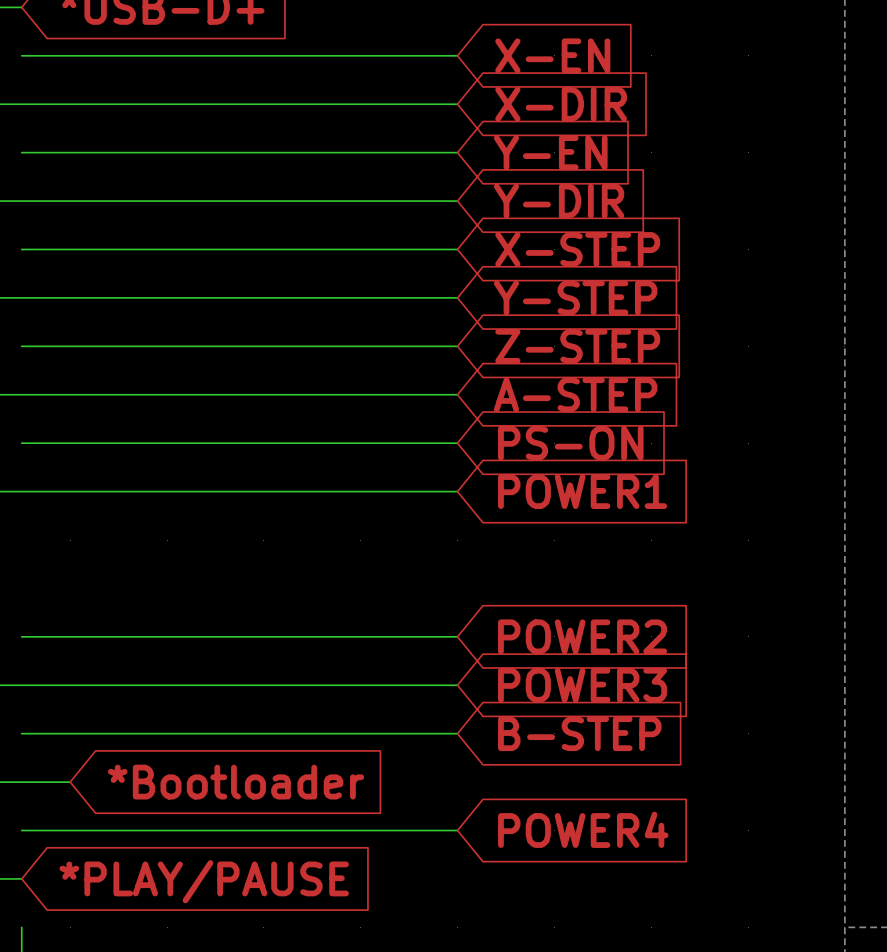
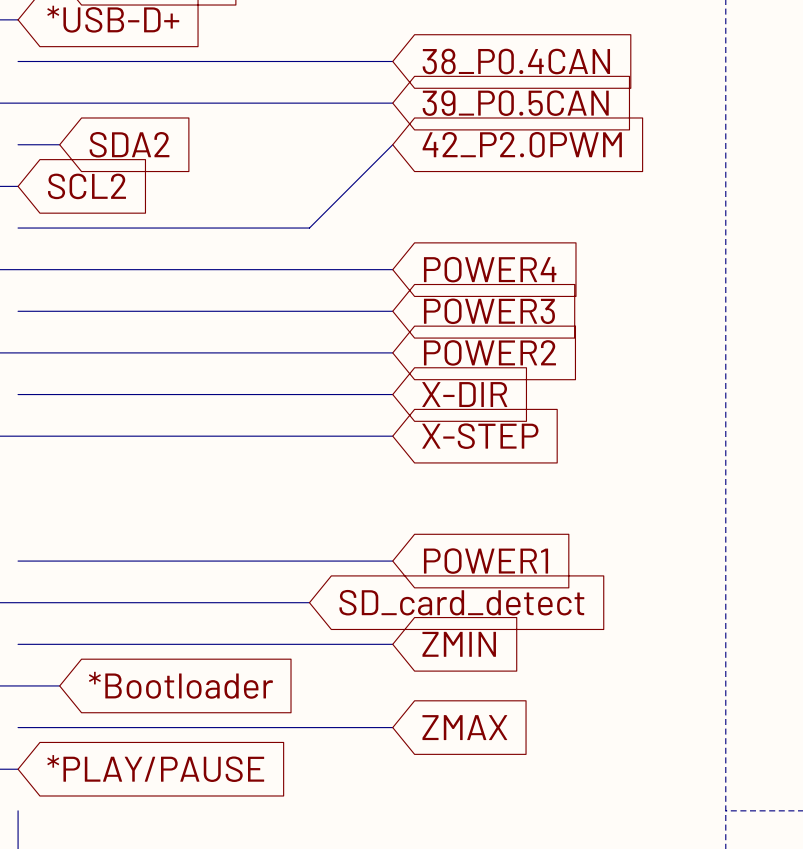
global label: X-EN (552, 55) -> 38_P0.4CAN (516, 61)
global label: X-DIR (561, 104) -> 39_P0.5CAN (515, 103)
wire: (70, 152) (457, 152) -> none
global label: none -> SDA2 (129, 144)
global label: Y-EN (550, 152) -> 42_P2.0PWM (522, 144)
wire: (21, 201) (457, 201) -> none
global label: none -> SCL2 (87, 186)
global label: Y-DIR (559, 201) -> none
wire: (360, 249) (457, 249) -> (309, 228) (392, 144)
global label: X-STEP (577, 249) -> none
global label: Y-STEP (575, 297) -> POWER4 (490, 269)
global label: Z-STEP (577, 346) -> POWER3 (489, 311)
global label: A-STEP (575, 394) -> POWER2 (489, 352)
global label: PS-ON (570, 443) -> X-DIR (464, 394)
global label: POWER1 (582, 491) -> X-STEP (480, 436)
global label: POWER2 (582, 636) -> POWER1 (486, 561)
wire: (360, 685) (457, 685) -> none
global label: POWER3 (582, 685) -> none
global label: none -> SD_card_detect (461, 602)
global label: B-STEP (579, 733) -> ZMIN (459, 644)
global label: POWER4 (583, 829) -> ZMAX (464, 727)

